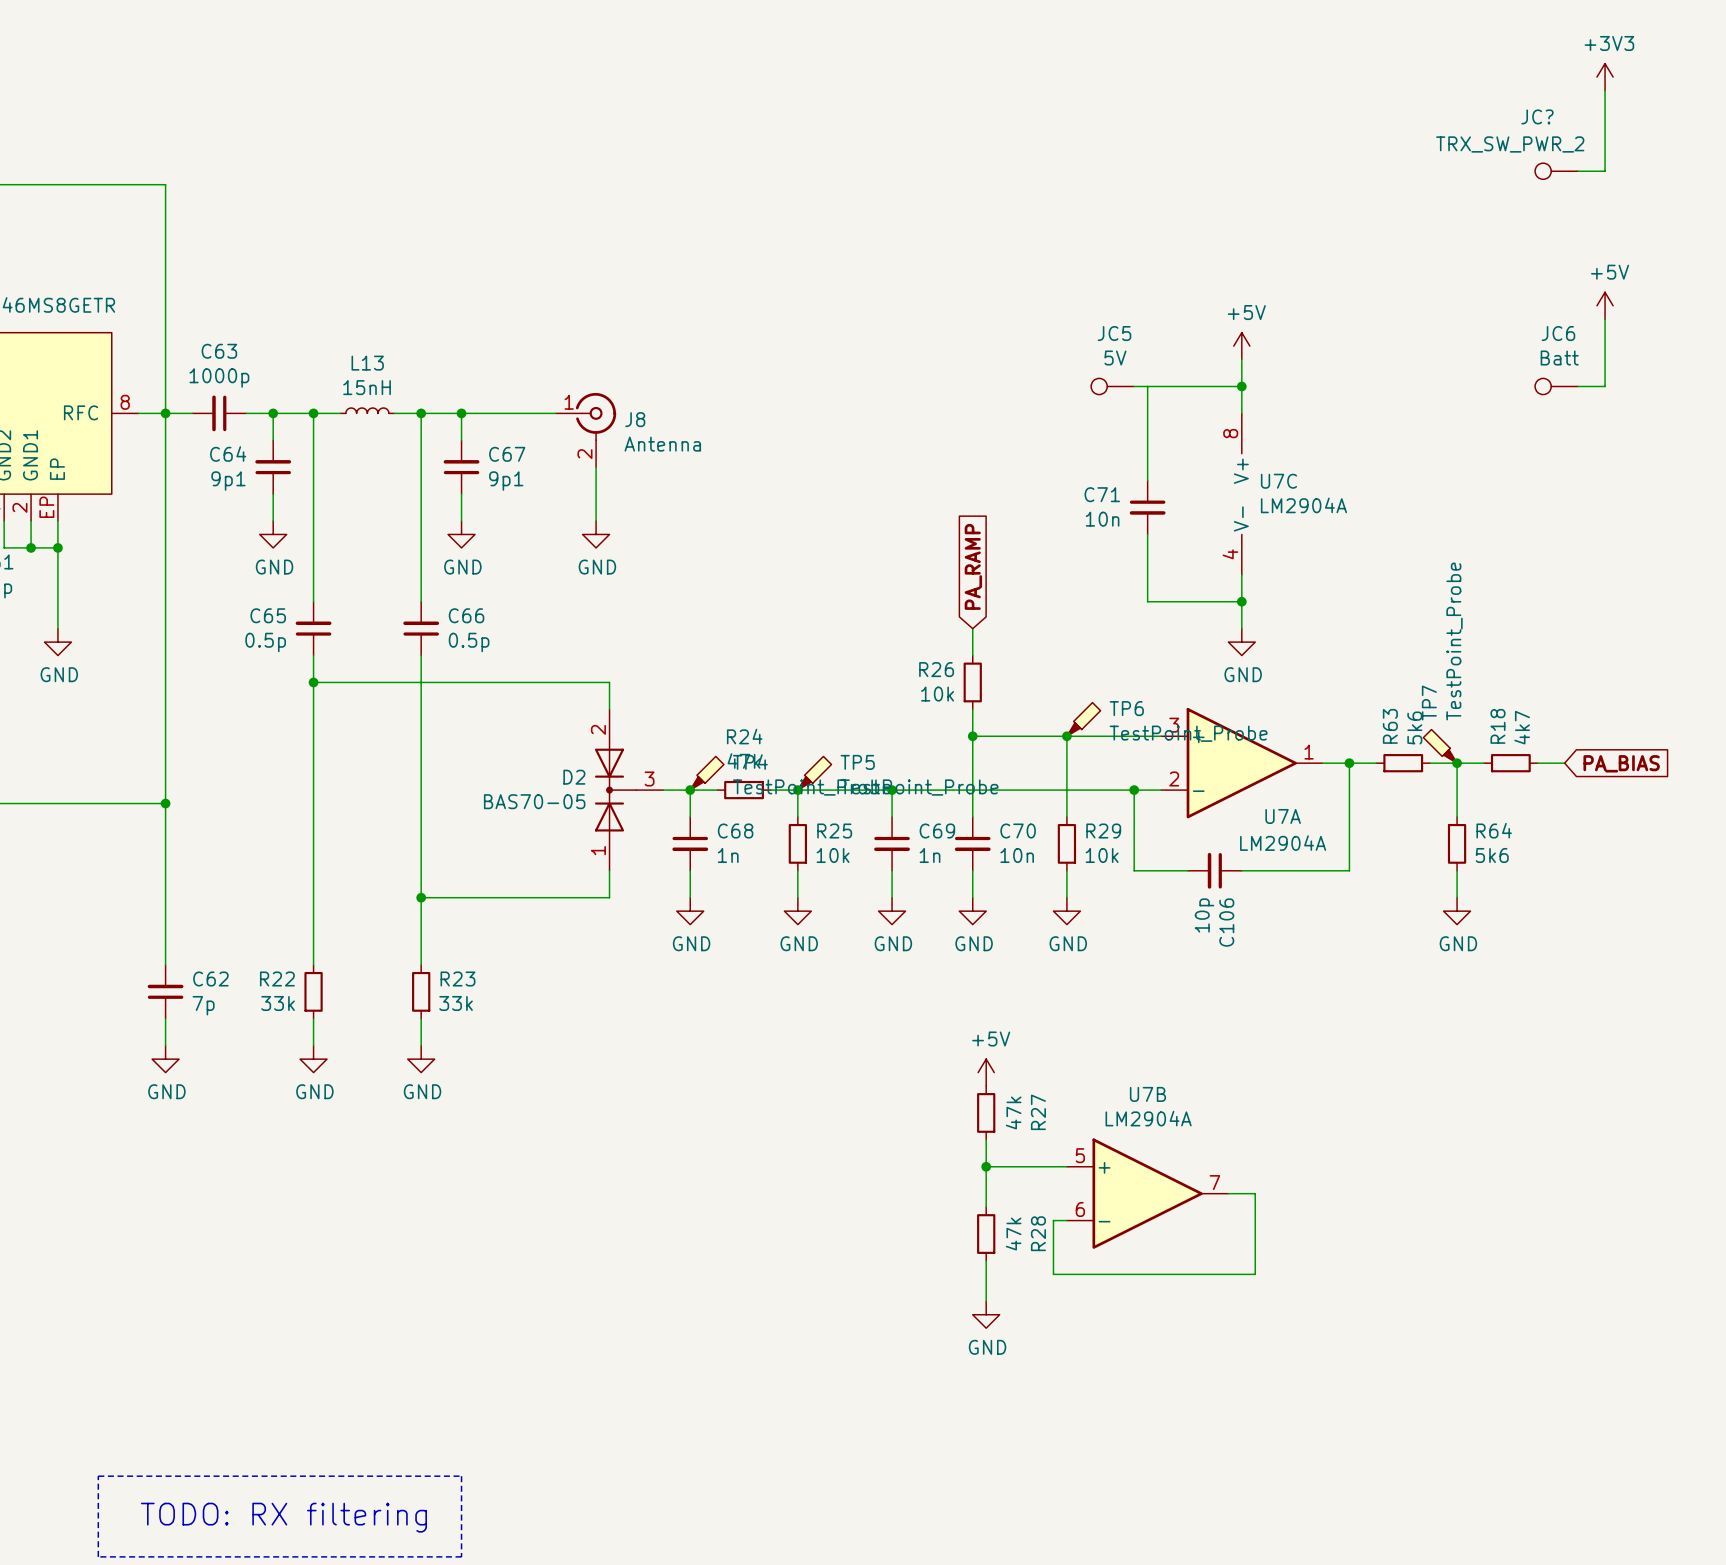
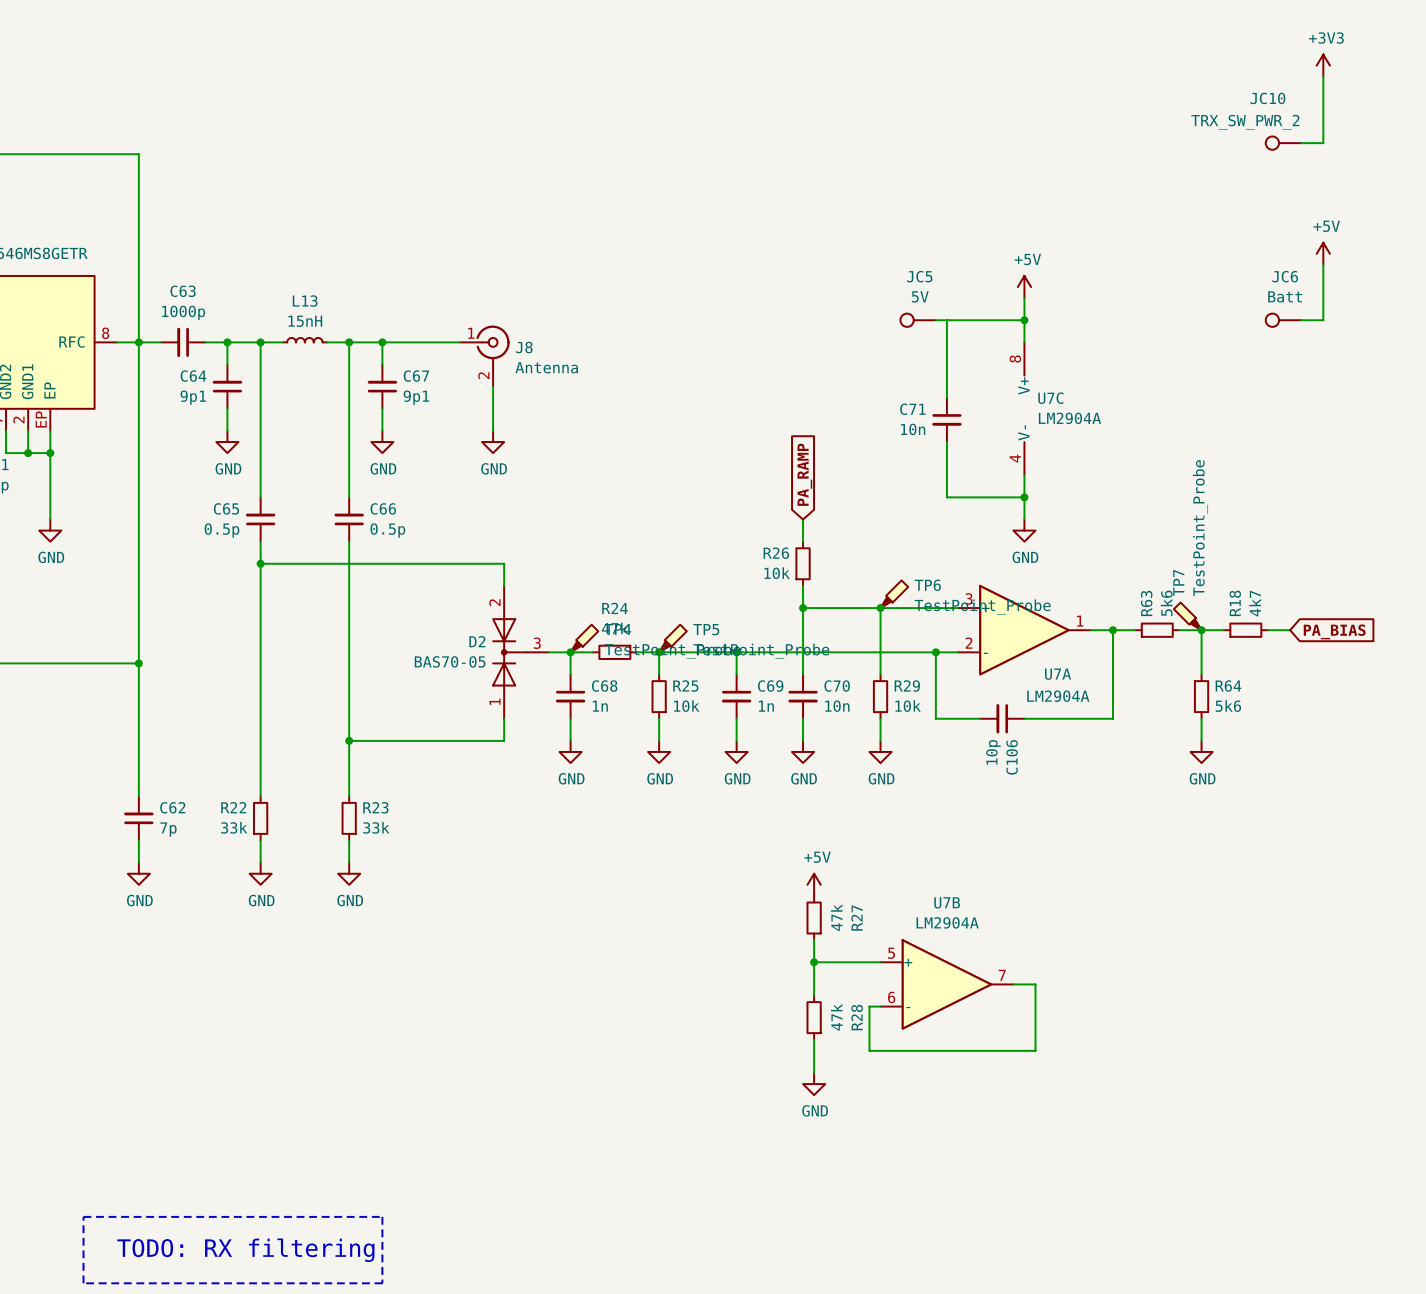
JC? name: JC? (1537, 116) -> JC10 (1267, 98)

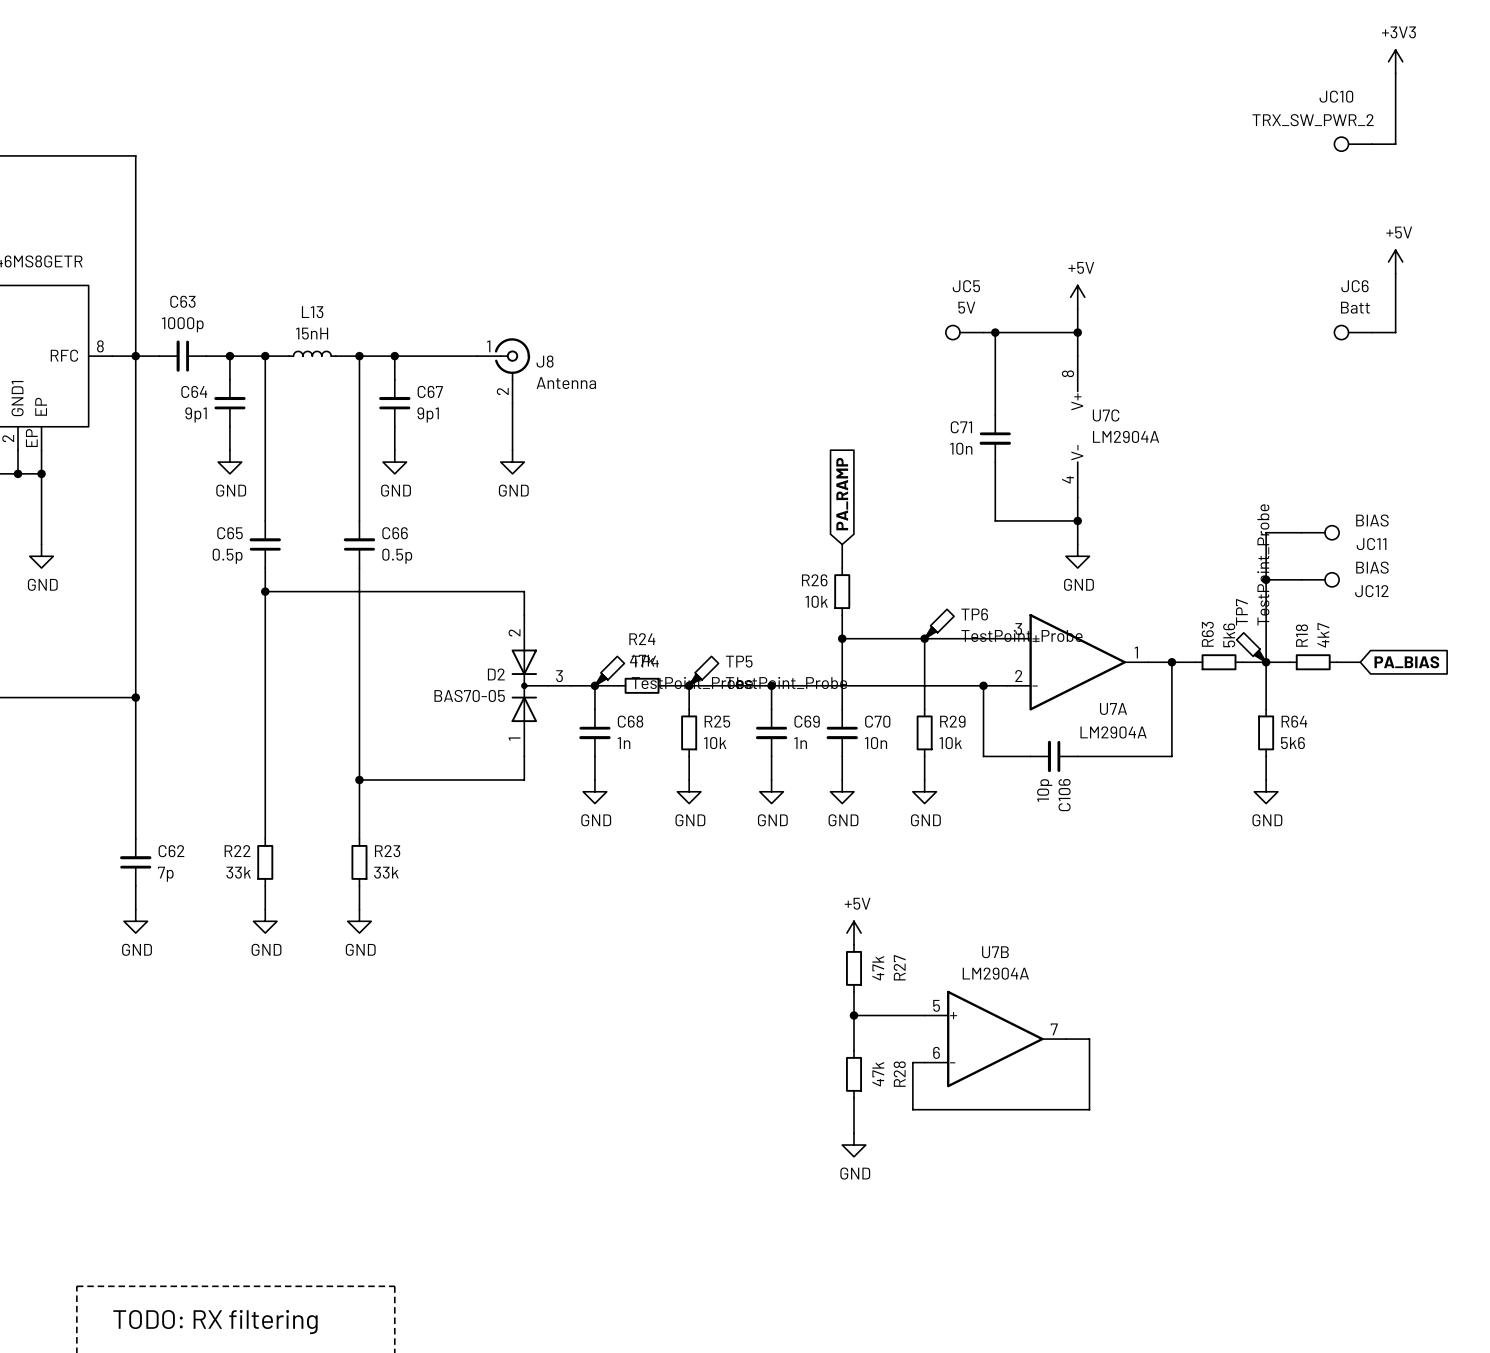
junction: none -> (995, 332)
wire: none -> (1301, 532) (1266, 532) (1266, 662)
JC11: none -> BIAS (1320, 532)
wire: none -> (1266, 579) (1301, 579)
junction: none -> (1266, 579)
JC12: none -> BIAS (1320, 579)

